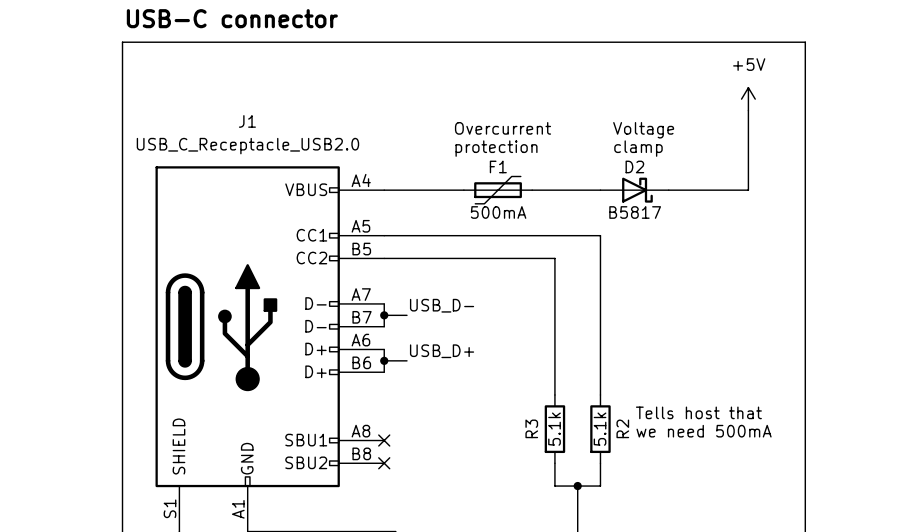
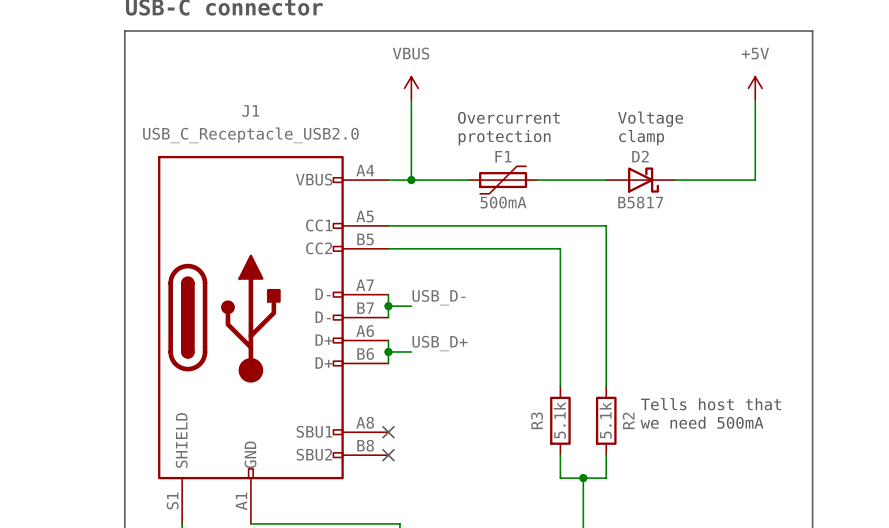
power symbol: none -> VBUS (411, 88)
wire: none -> (411, 99) (411, 180)
junction: none -> (411, 180)

